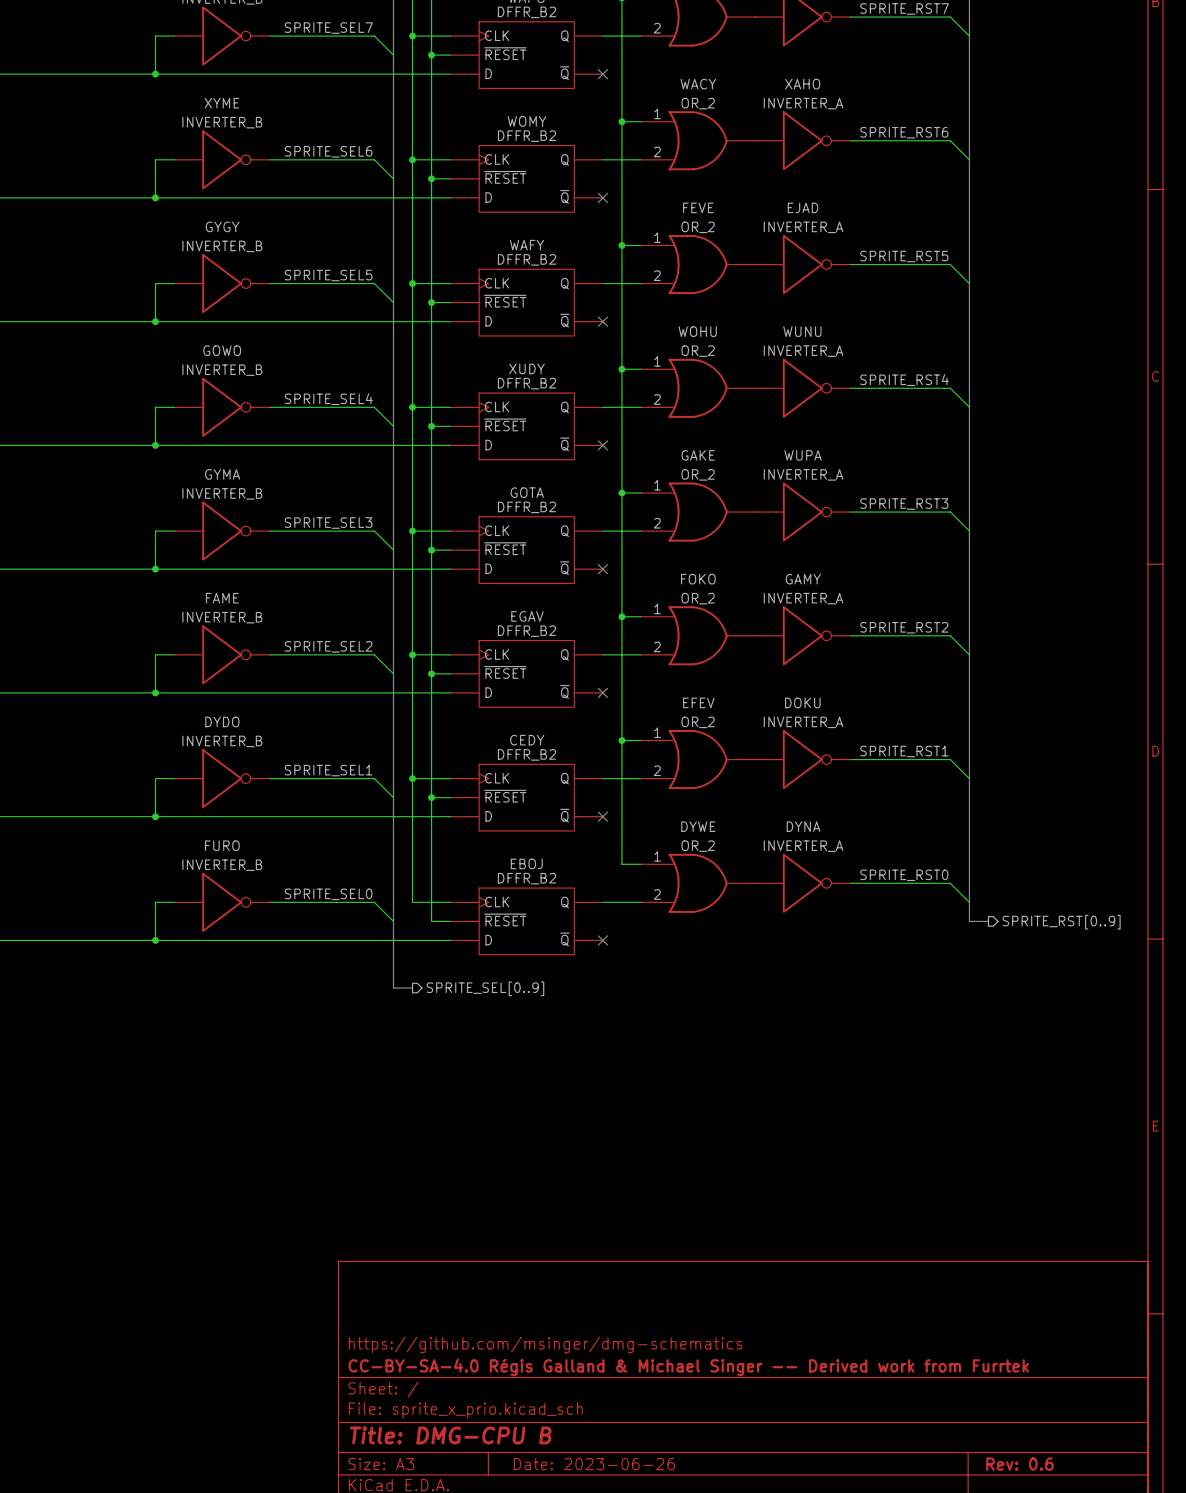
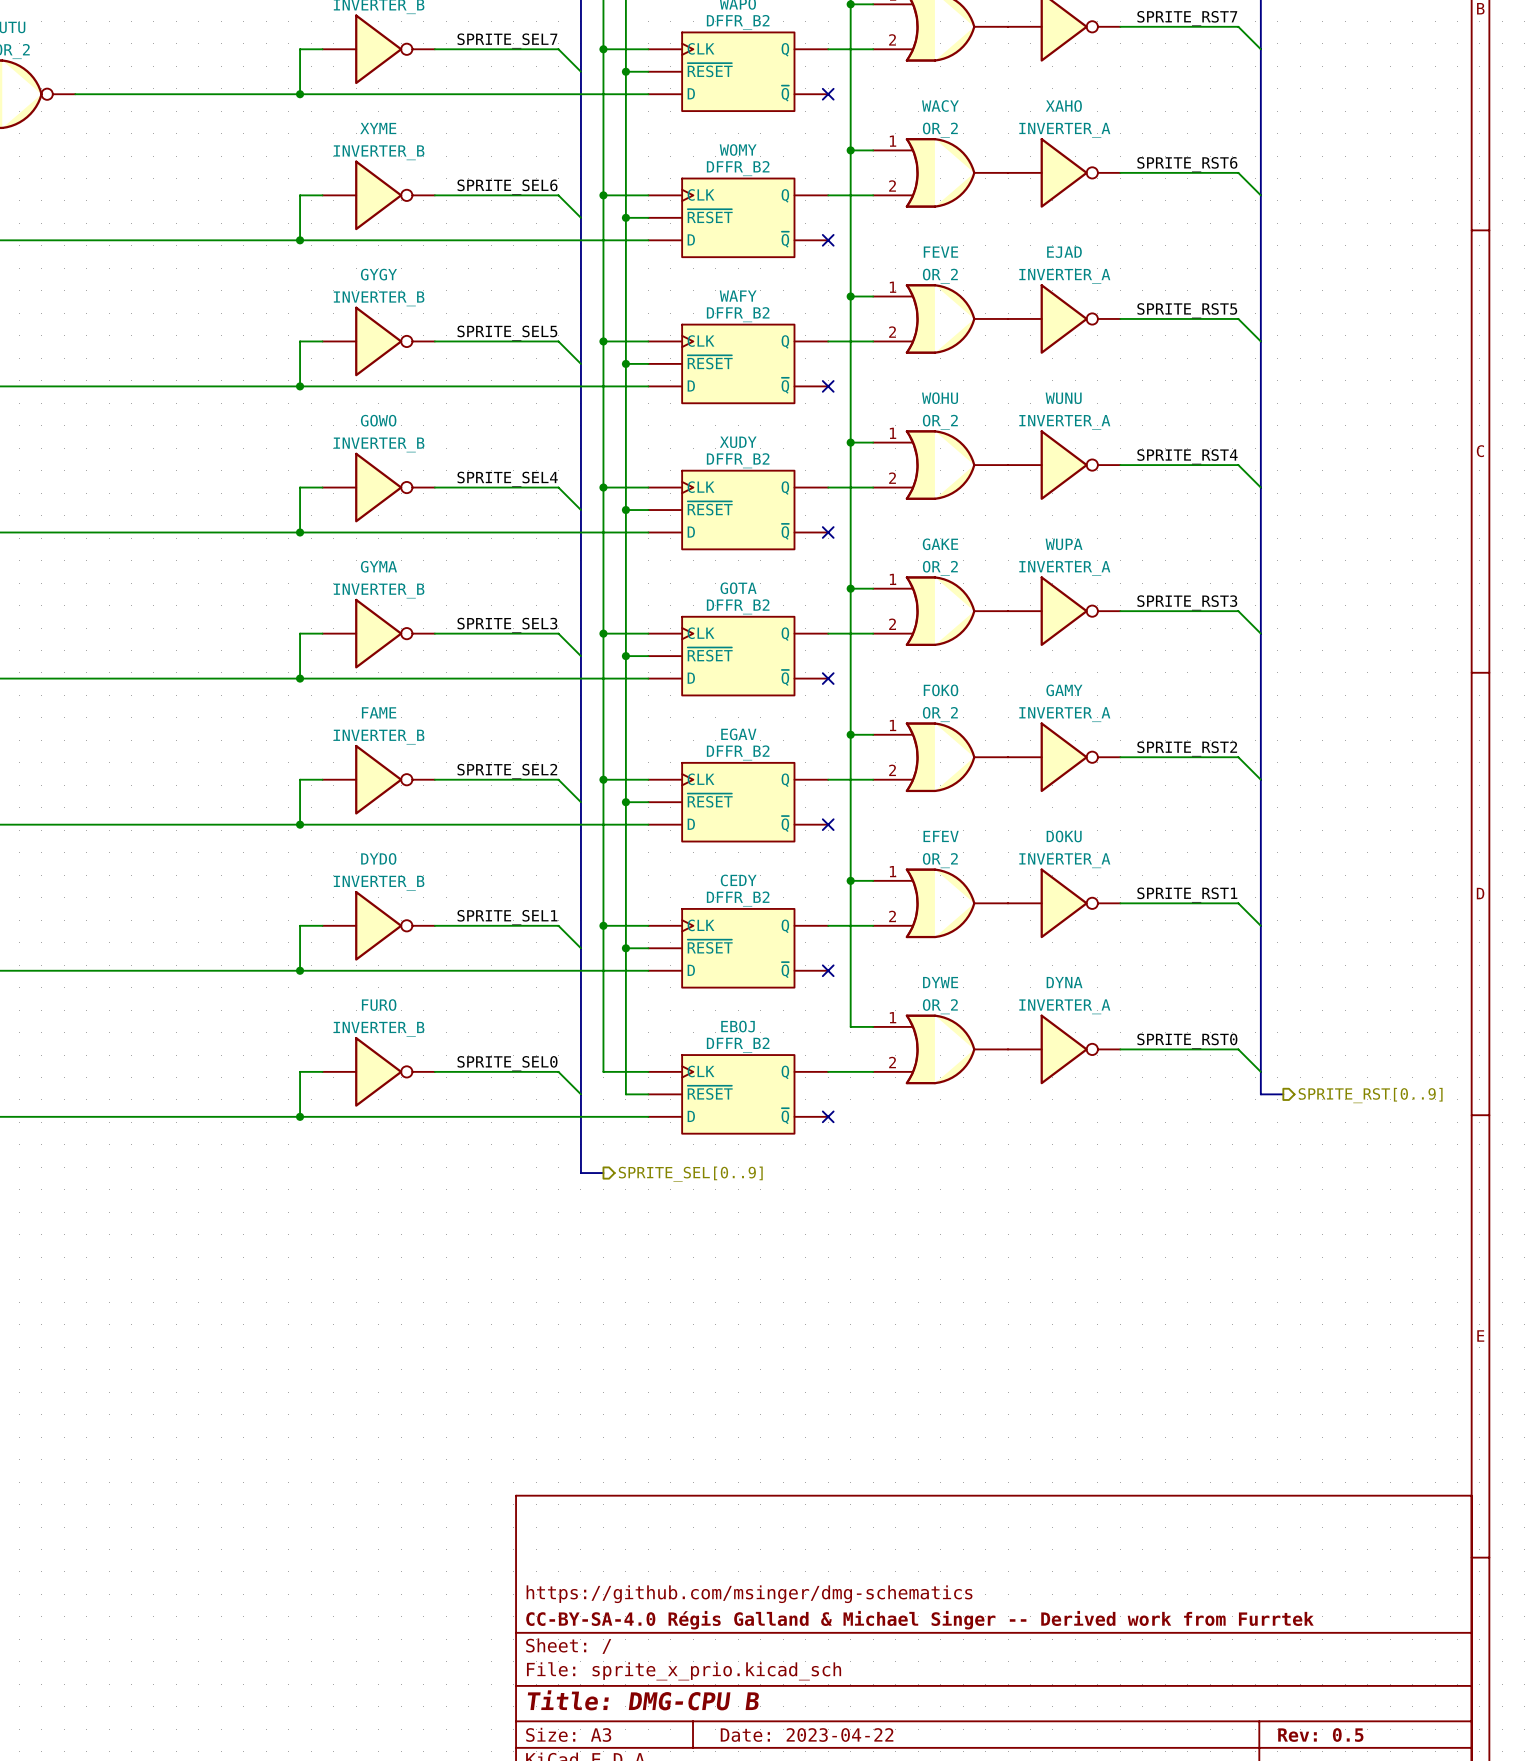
title block: Date: 2023-06-26 (594, 1464) -> Date: 2023-04-22 (807, 1735)
title block: Rev: 0.6 (1019, 1464) -> Rev: 0.5 (1320, 1735)

